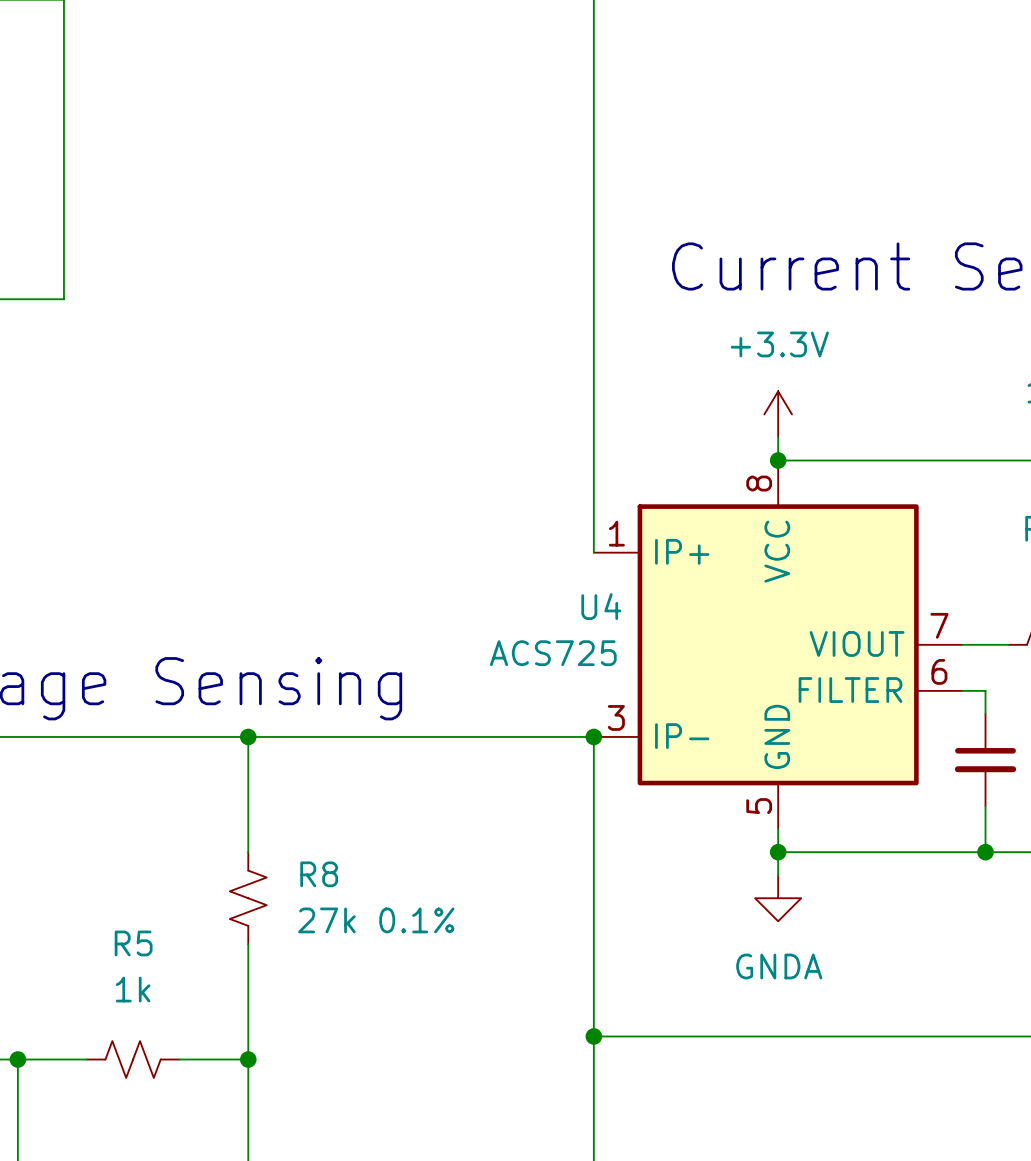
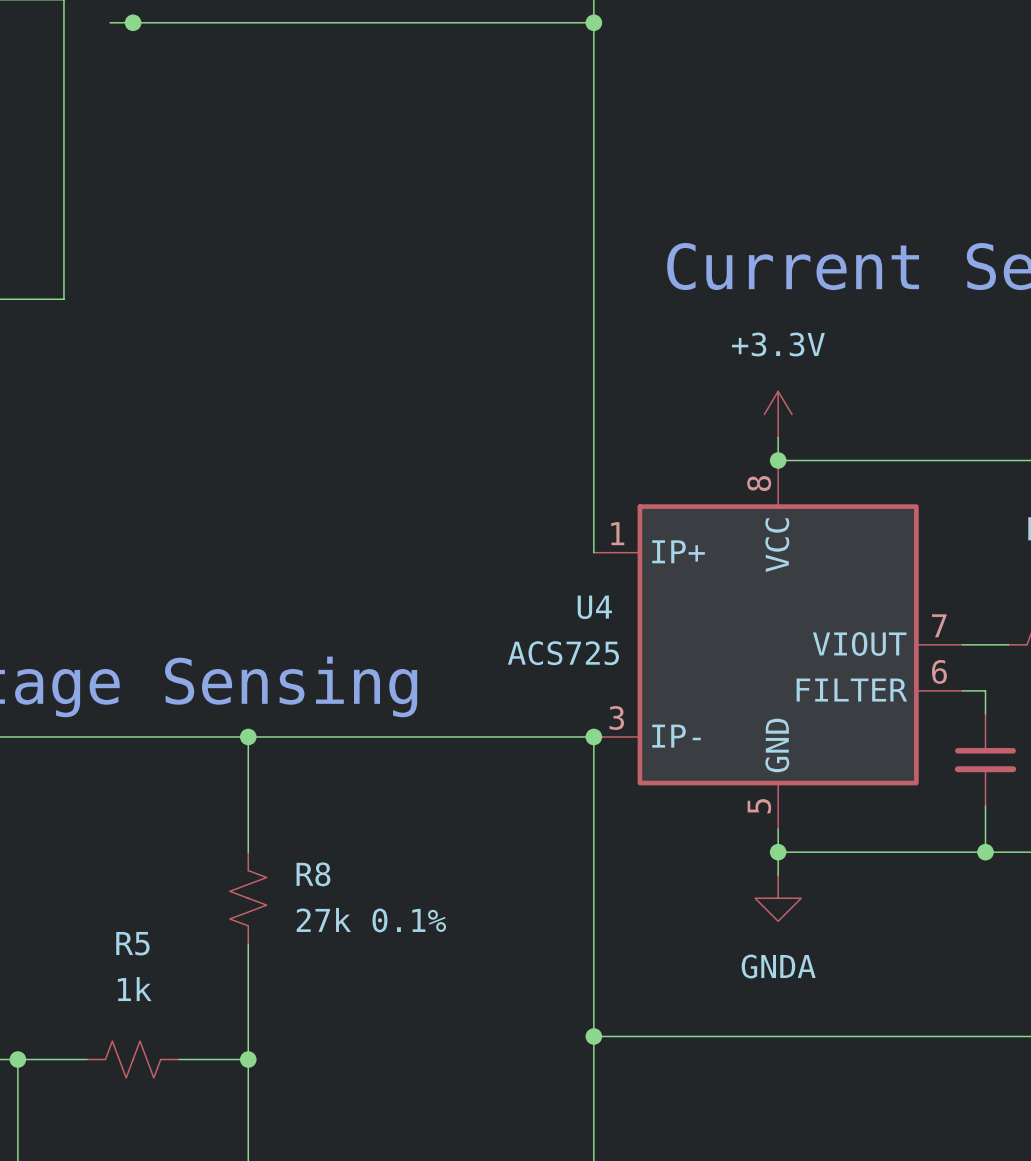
wire: none -> (110, 22) (593, 22)
junction: none -> (133, 22)
junction: none -> (593, 22)

